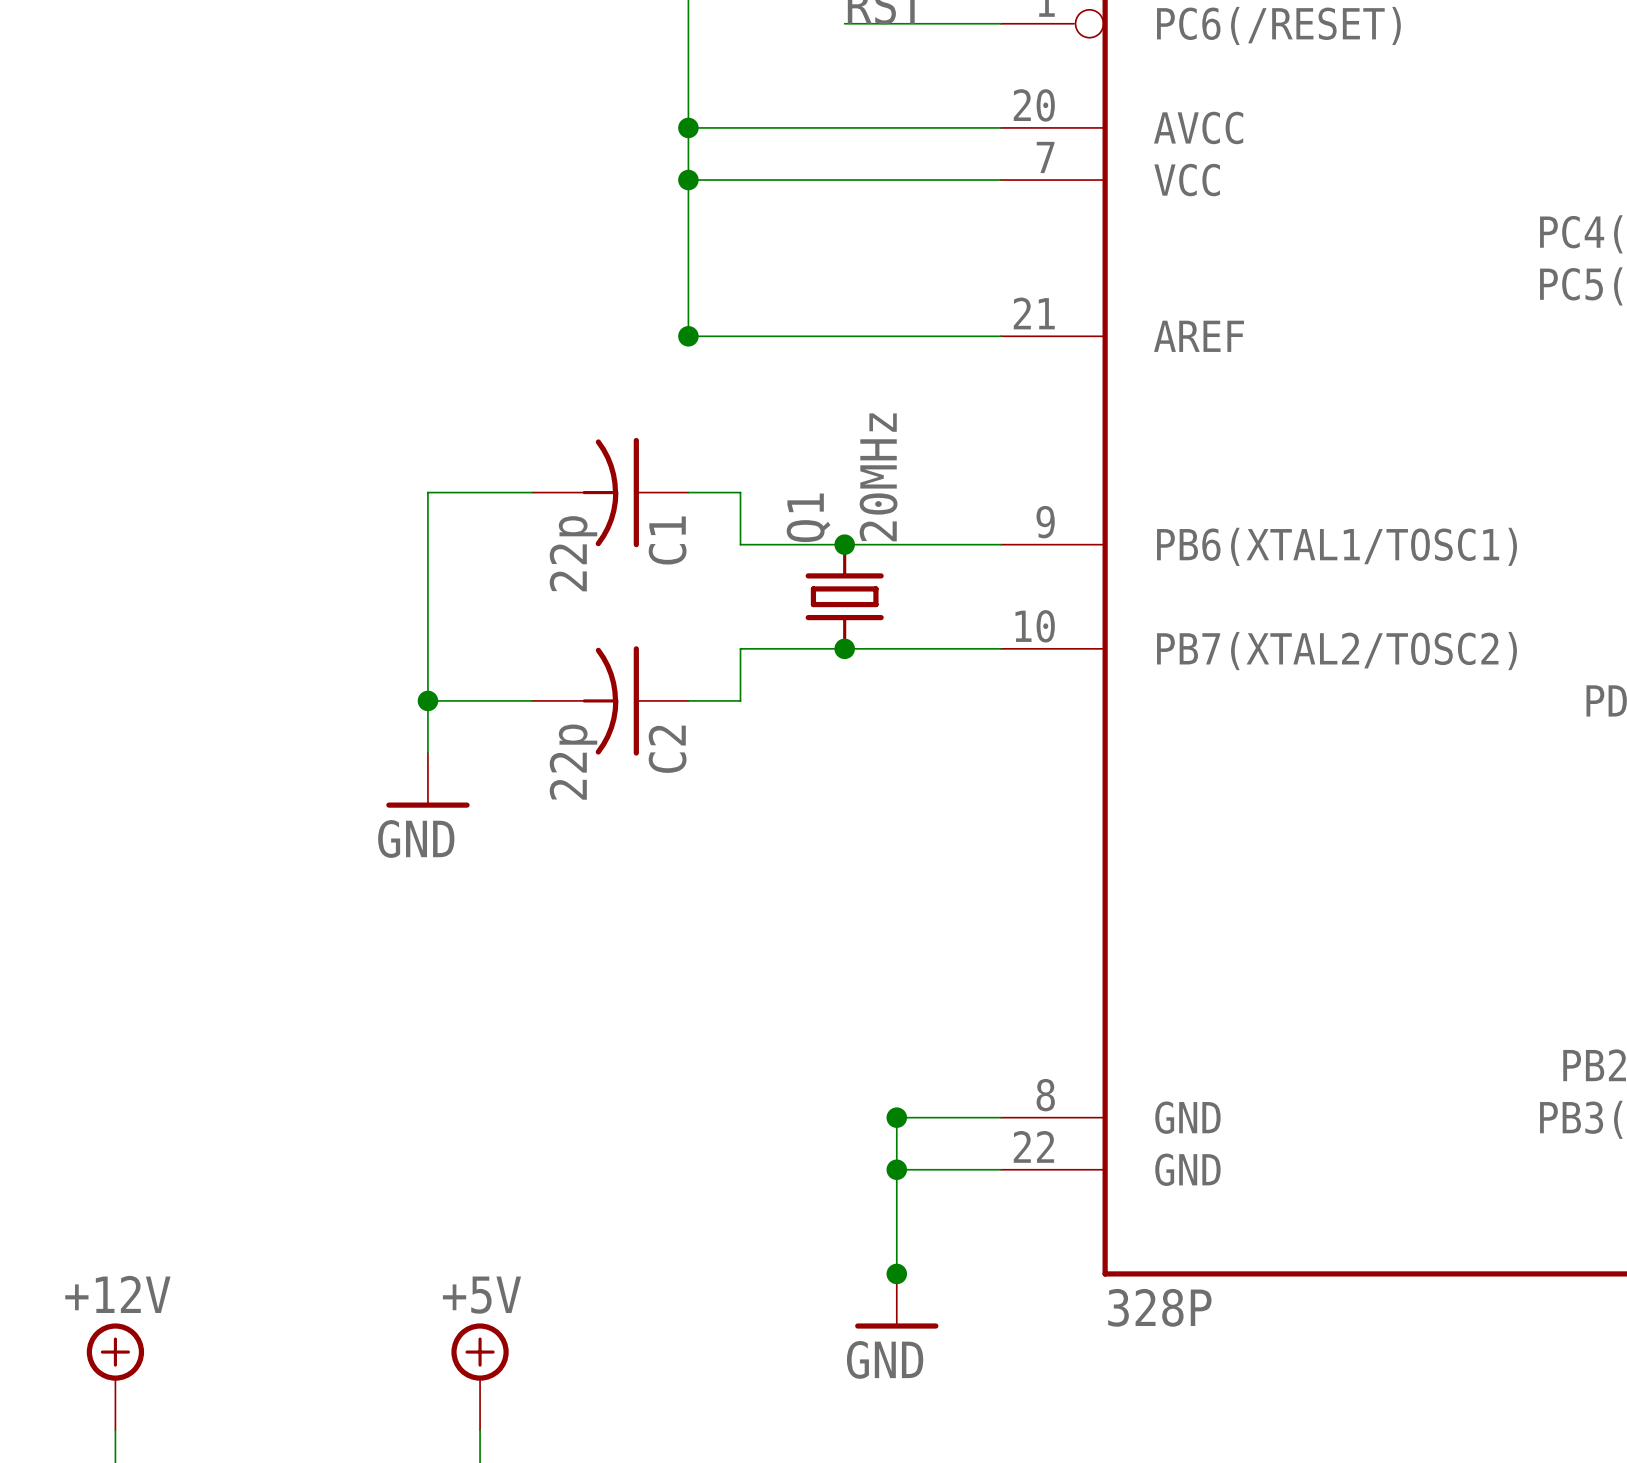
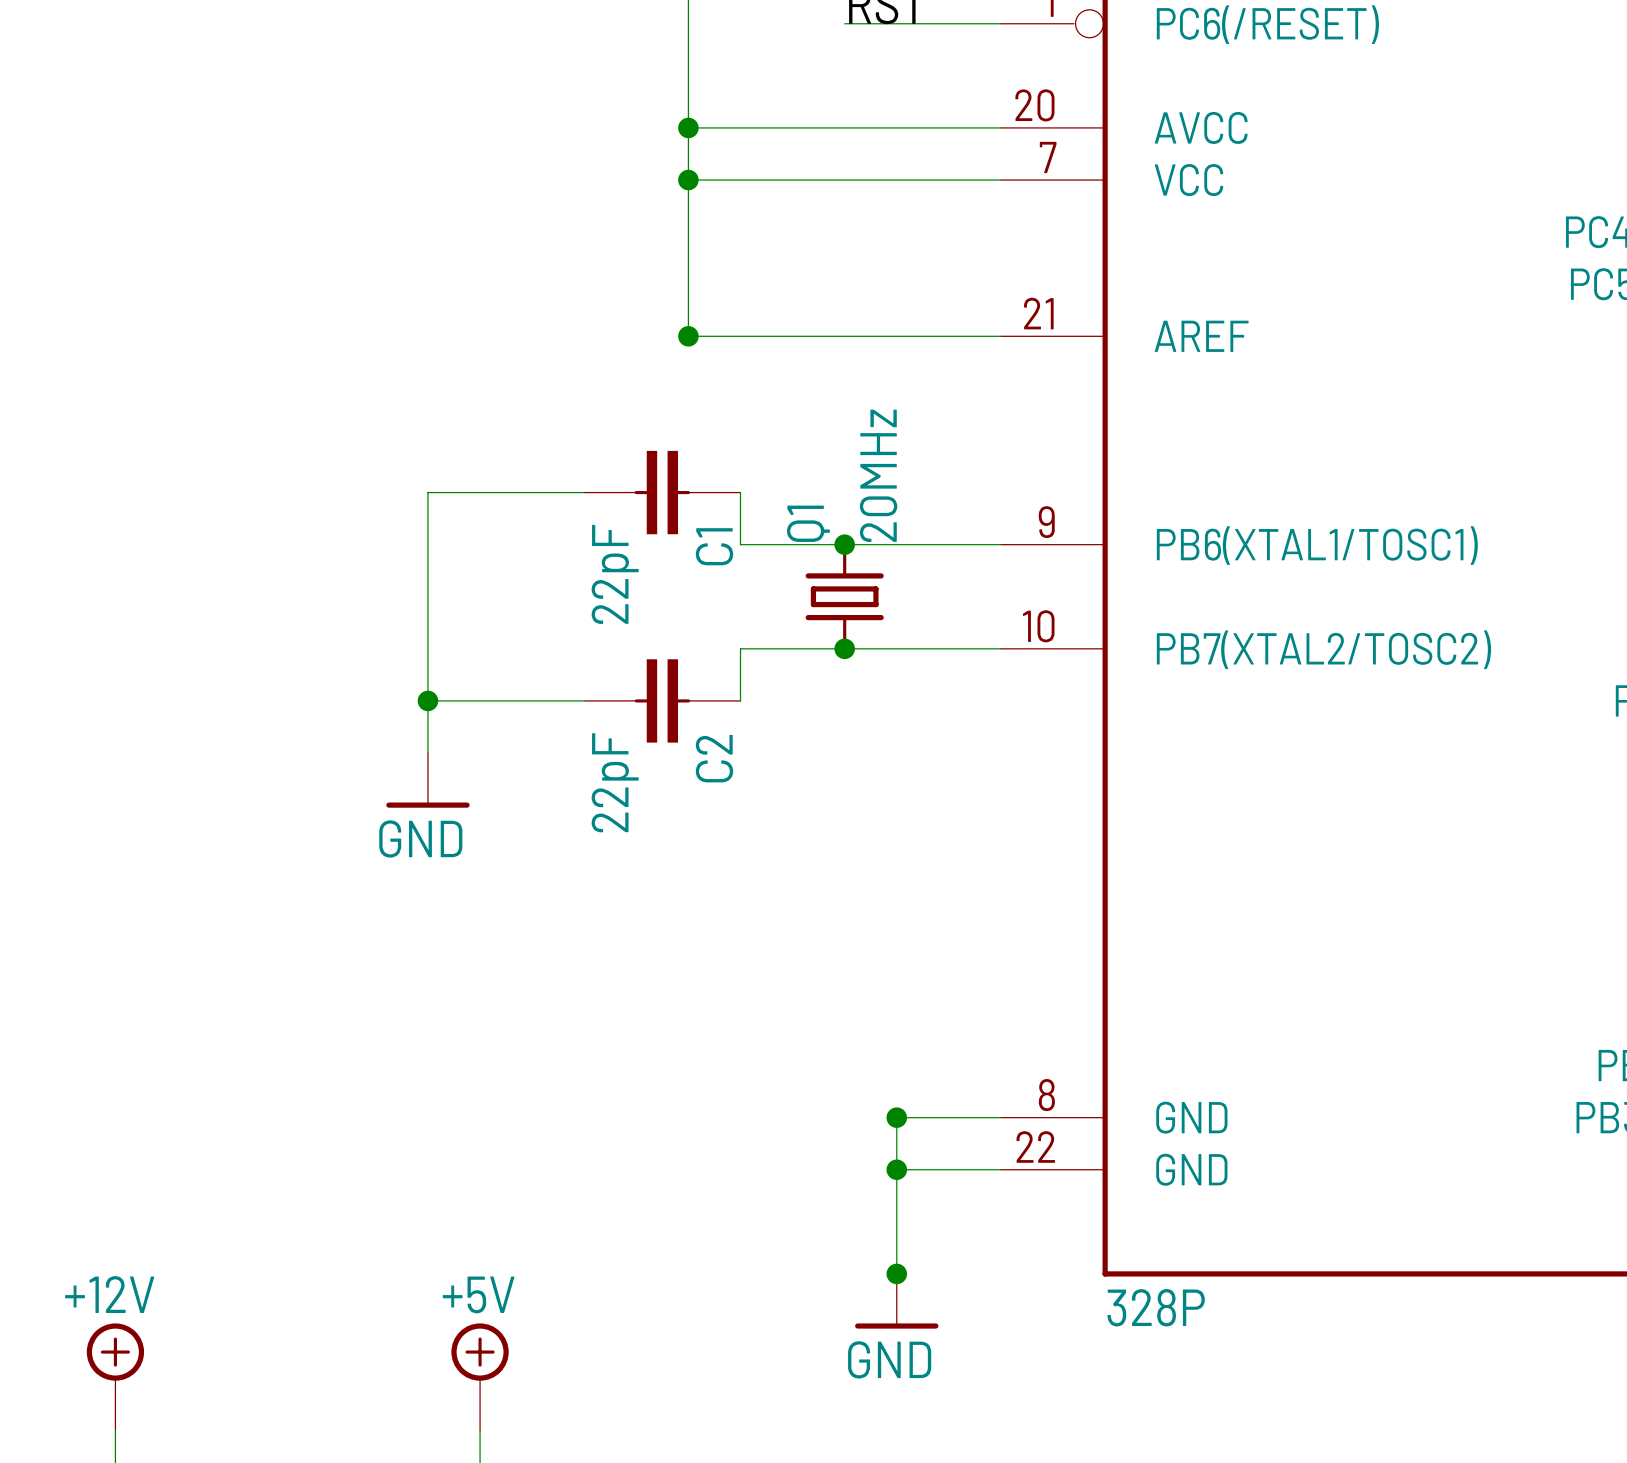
C1 symbol: [532, 437, 689, 548] -> [584, 450, 741, 535]
C1 value: 22p (573, 553) -> 22pF (615, 574)
C2 symbol: [532, 646, 689, 756] -> [584, 659, 741, 743]
C2 value: 22p (573, 762) -> 22pF (615, 782)

